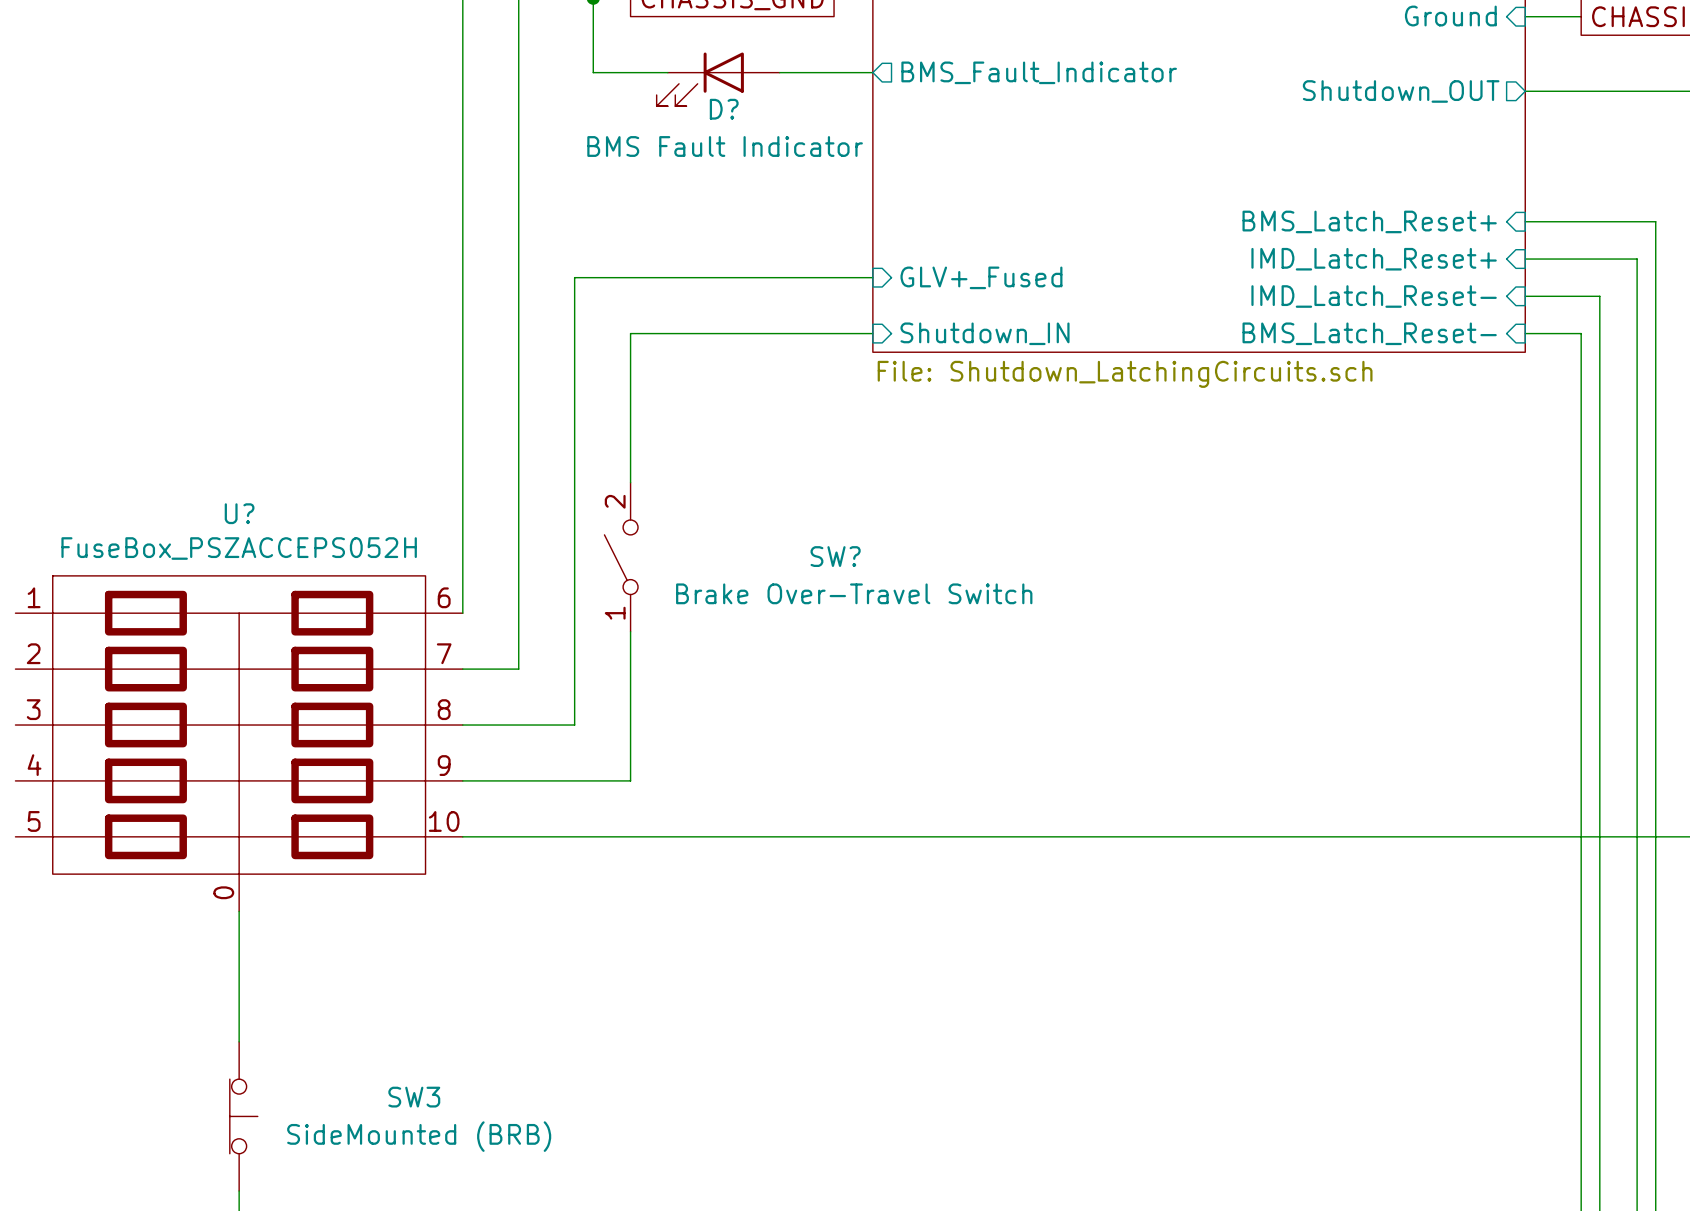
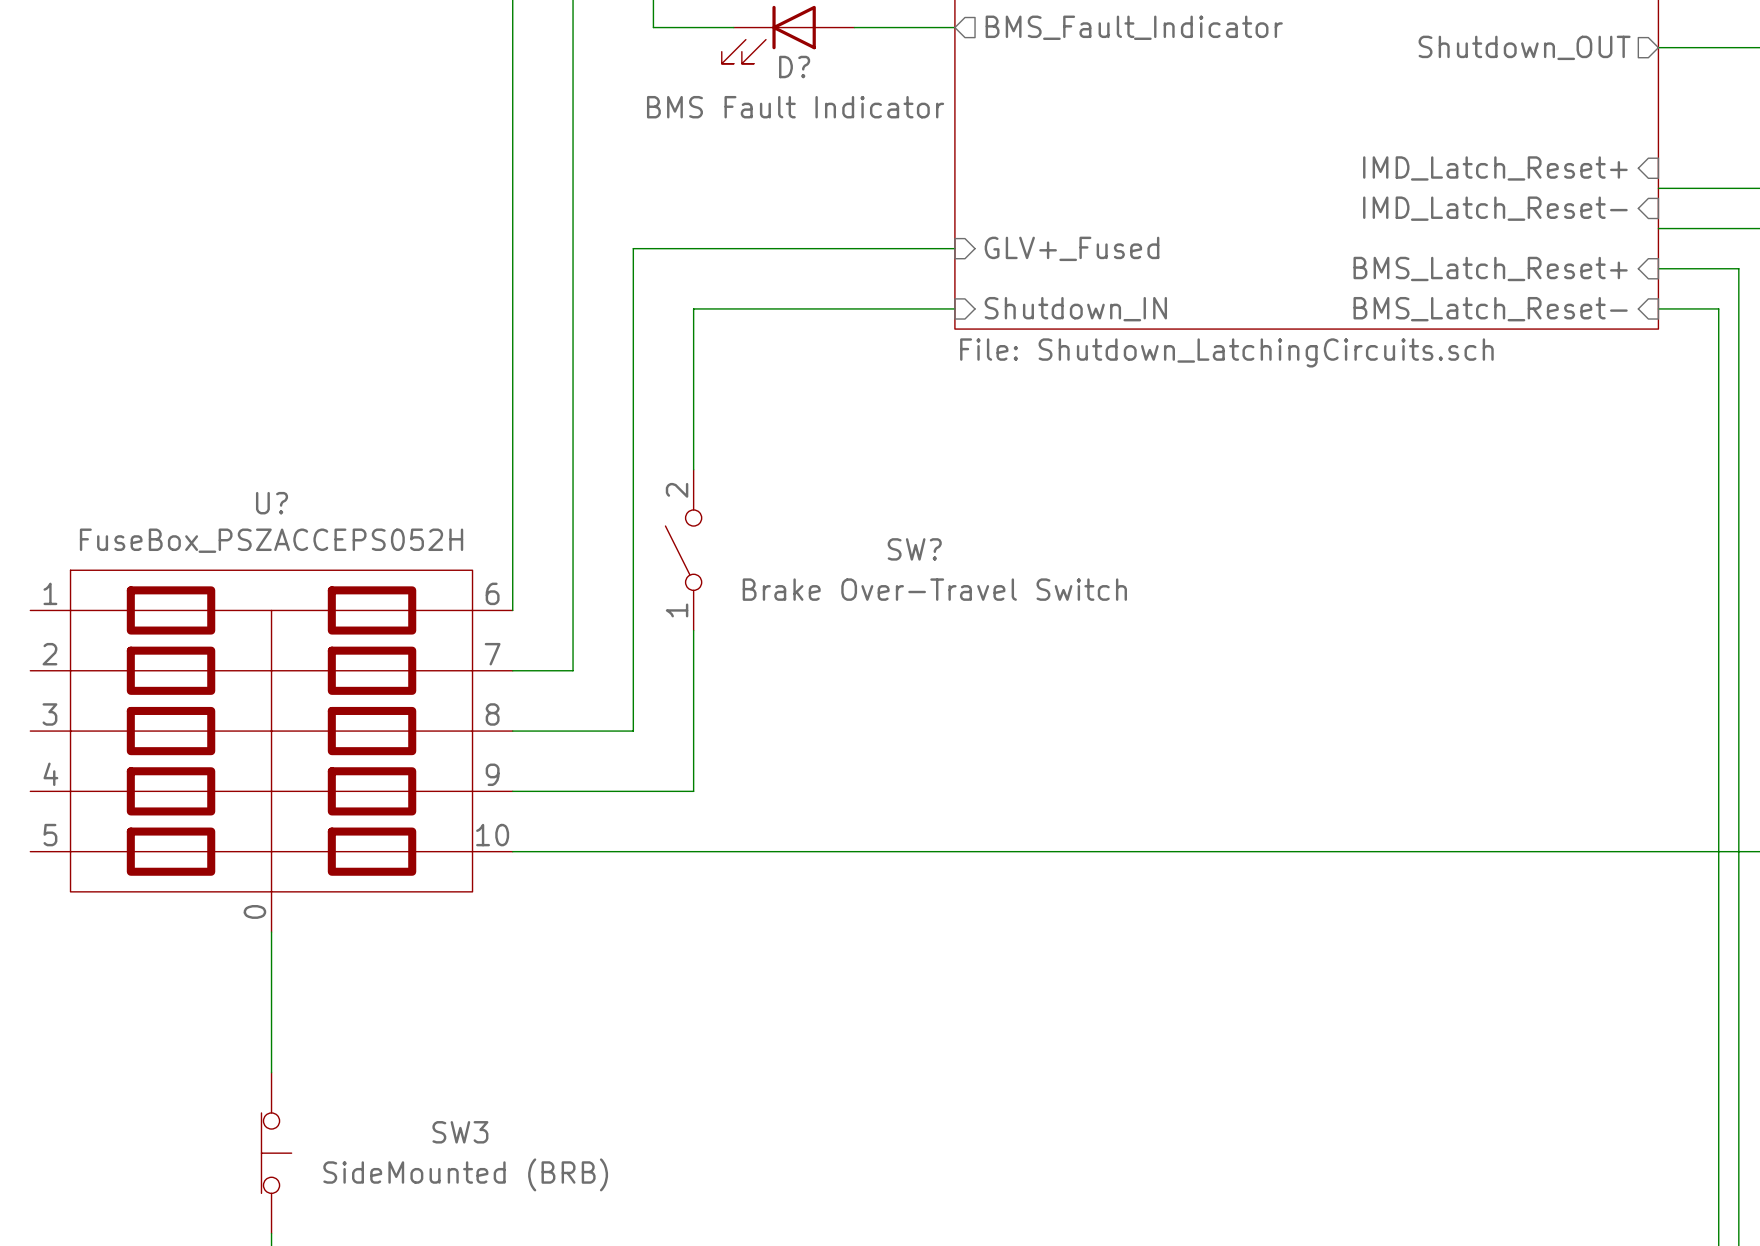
sheet pin: BMS_Latch_Reset+ (1369, 221) -> IMD_Latch_Reset- (1495, 208)
sheet pin position: IMD_Latch_Reset+ (1374, 259) -> IMD_Latch_Reset+ (1495, 168)
sheet pin: IMD_Latch_Reset- (1374, 296) -> BMS_Latch_Reset+ (1490, 268)

